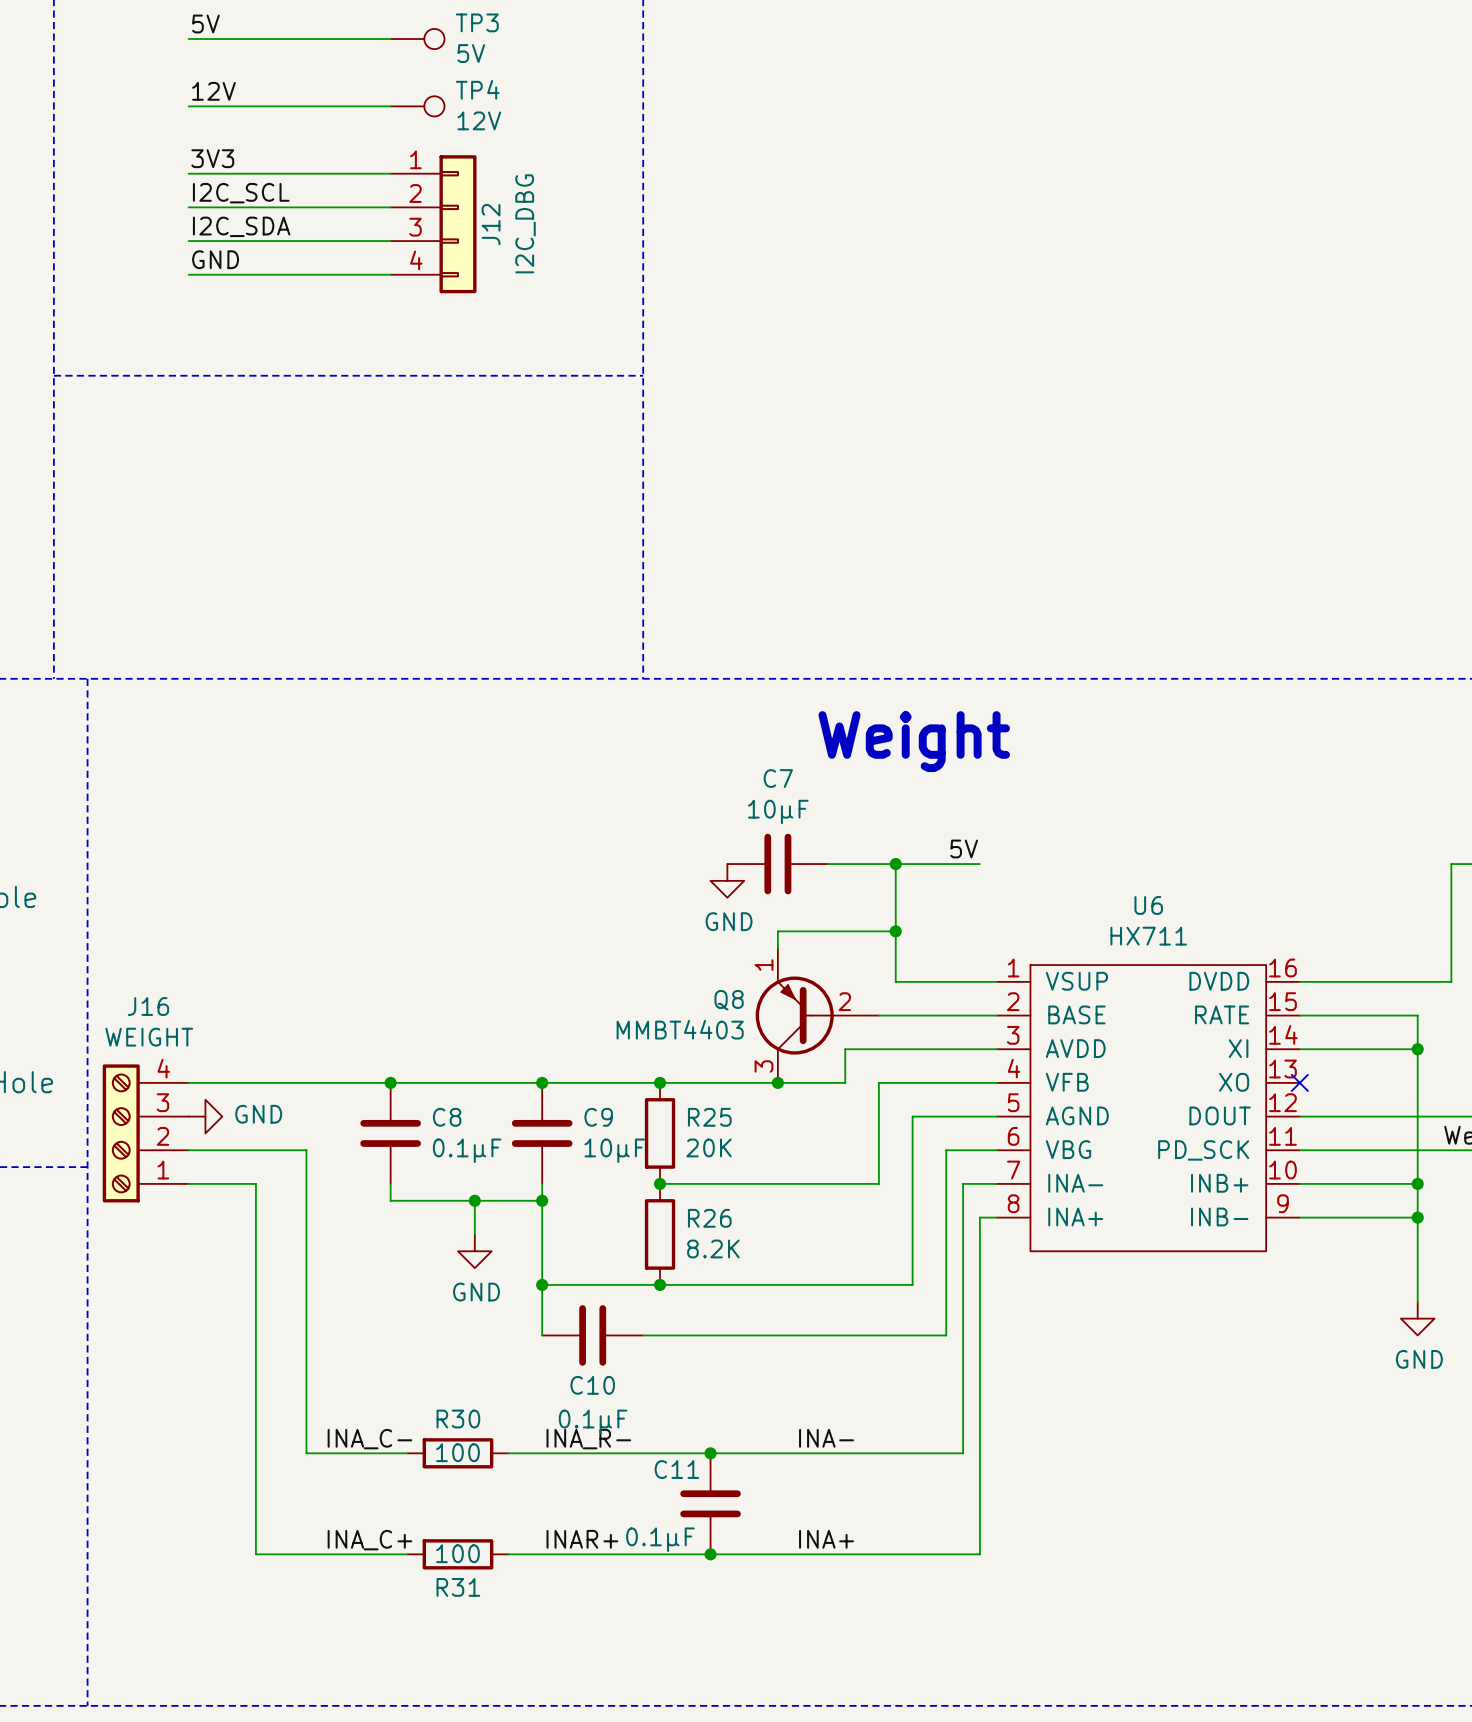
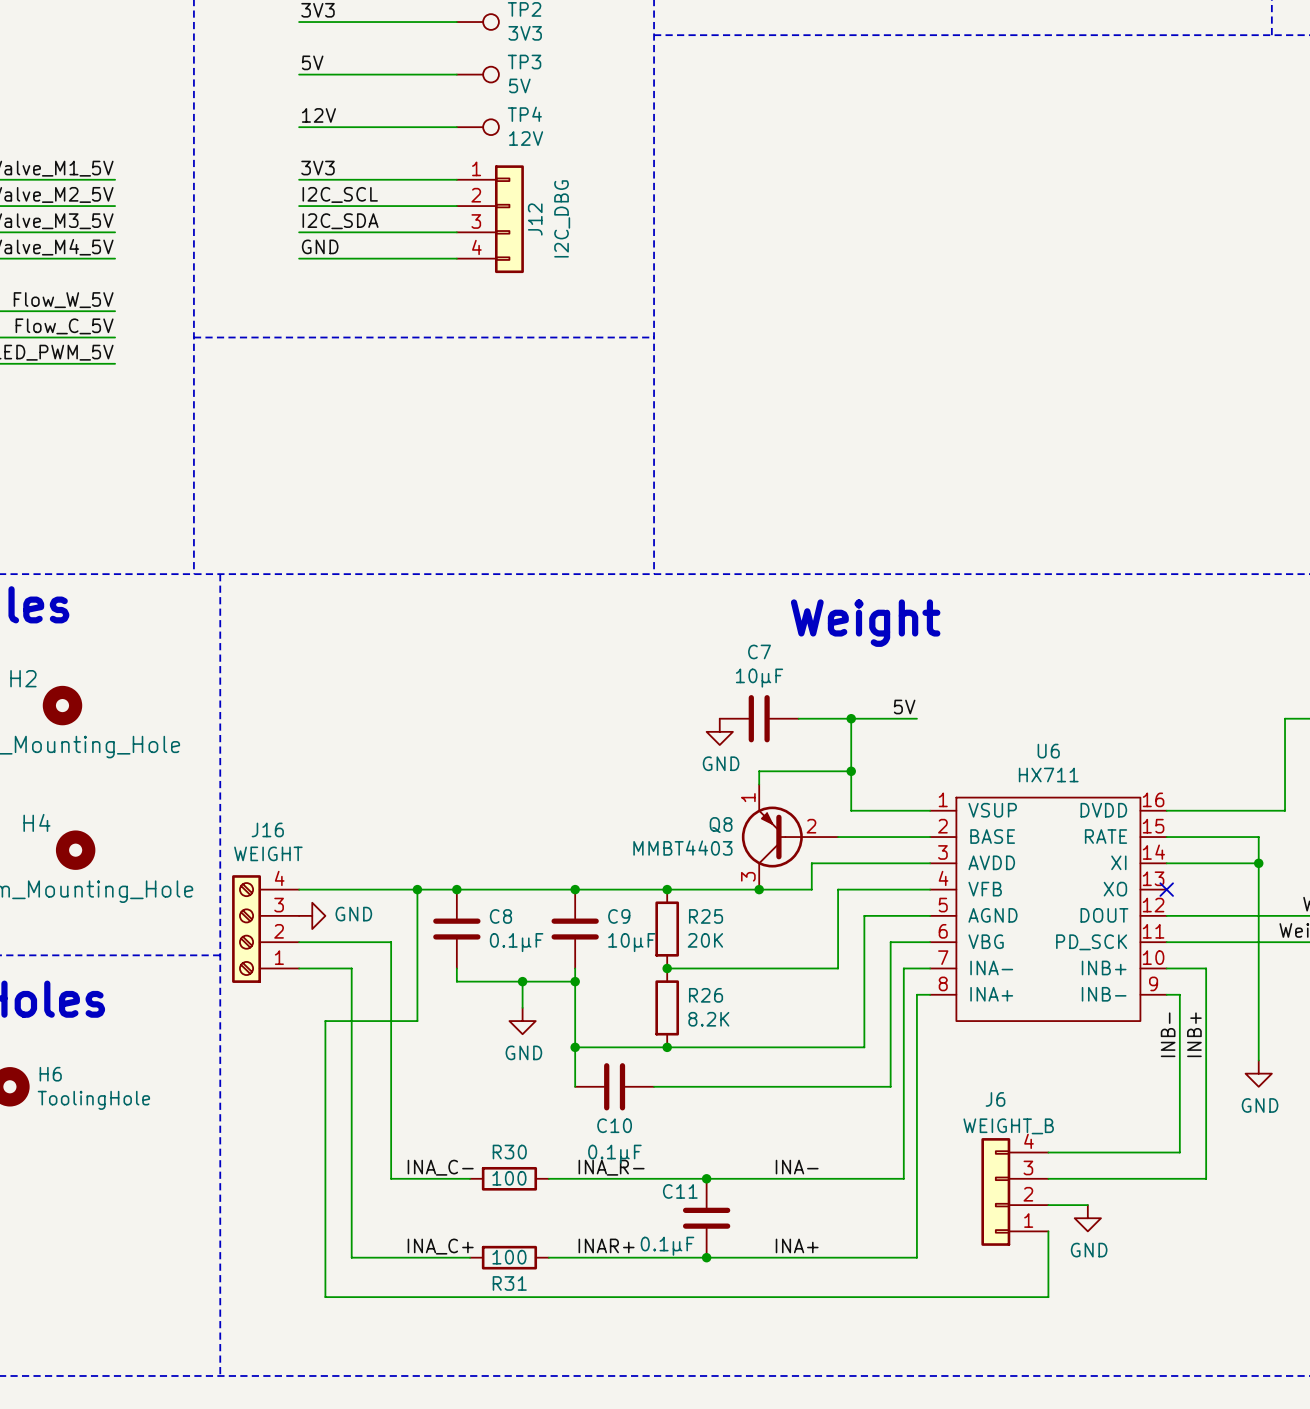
wire: none -> (417, 889) (417, 1021) (325, 1021) (325, 1297) (1048, 1297) (1048, 1231)
junction: none -> (417, 889)
wire: (1350, 1183) (1417, 1183) -> (1206, 968) (1206, 1178) (1048, 1178)
junction: (1417, 1183) -> none
wire: (1316, 1217) (1417, 1217) -> (1179, 994) (1179, 1152) (1048, 1152)
junction: (1417, 1217) -> none
label: none -> INB- (1168, 1034)
label: none -> INB+ (1194, 1034)
J6: none -> WEIGHT_B (1014, 1191)
wire: none -> (1048, 1205) (1087, 1205)
power symbol: none -> GND (1087, 1218)

